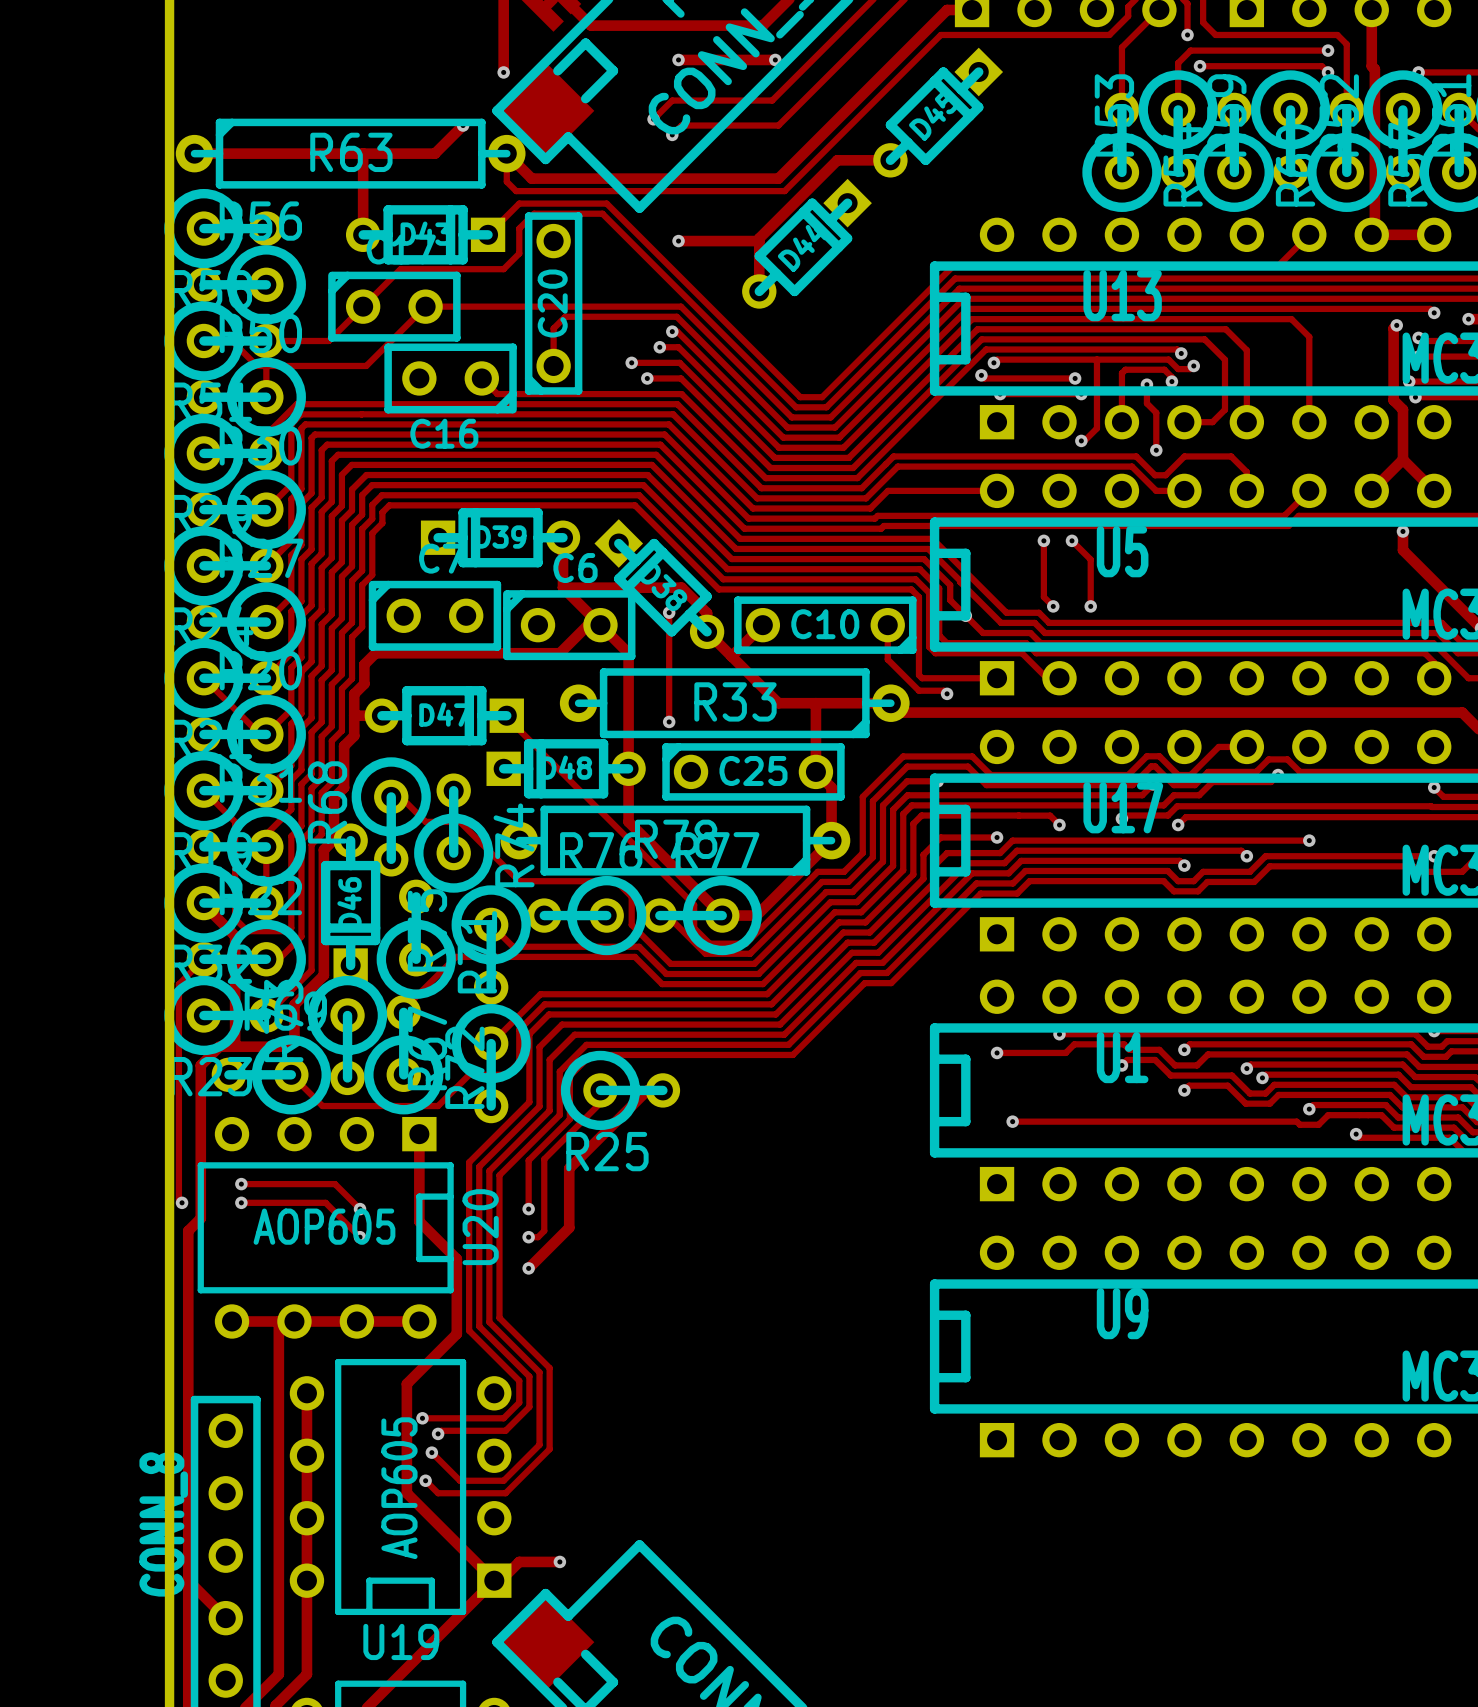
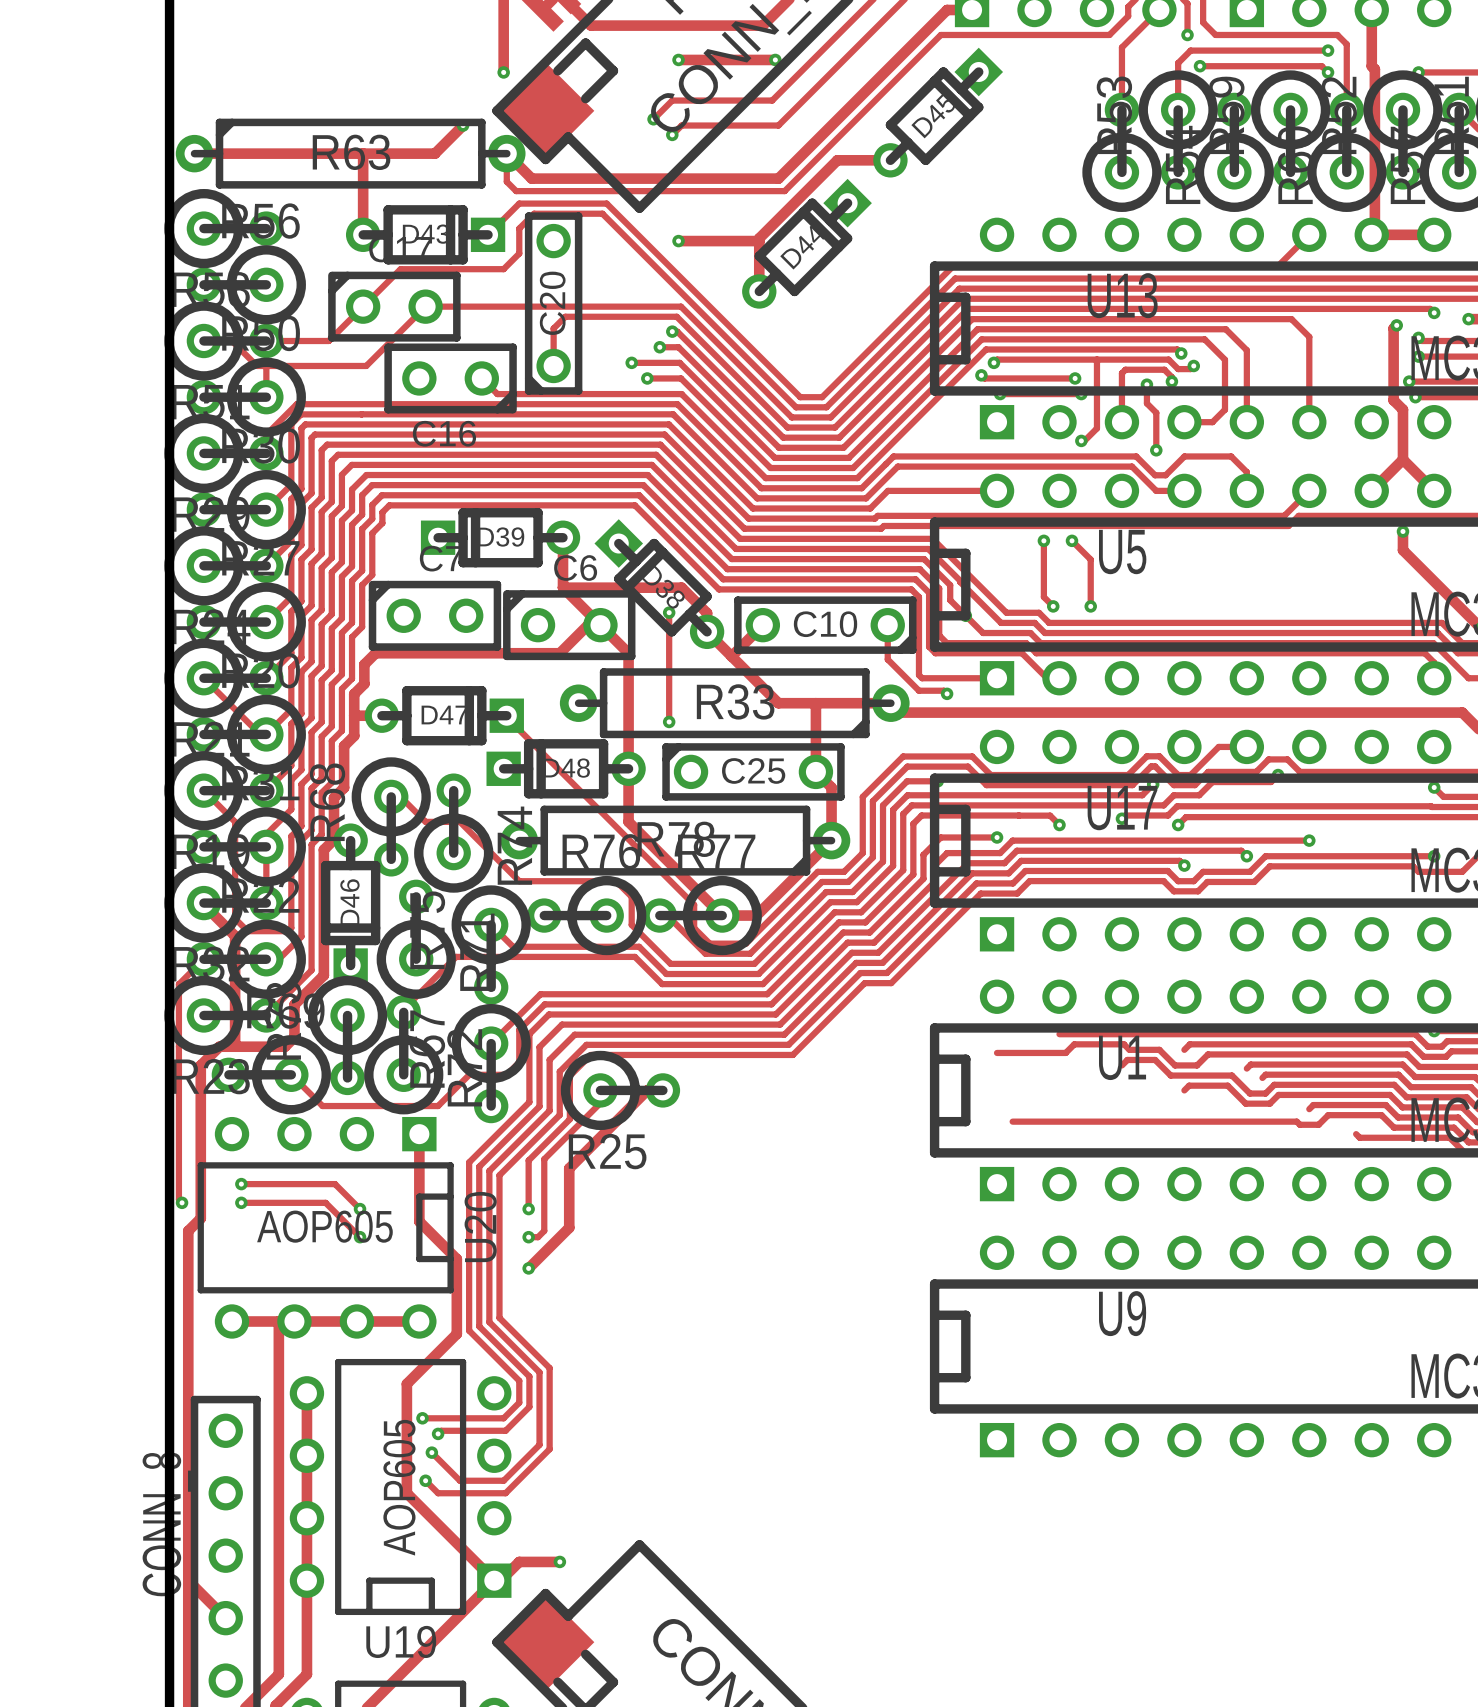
via: (1059, 1034) -> none
via: (1184, 1049) -> none
via: (997, 1052) -> none
via: (1121, 1065) -> none
via: (1246, 1068) -> none
via: (1262, 1077) -> none
via: (1184, 1090) -> none
via: (1309, 1109) -> none
via: (1012, 1121) -> none
via: (1356, 1134) -> none

